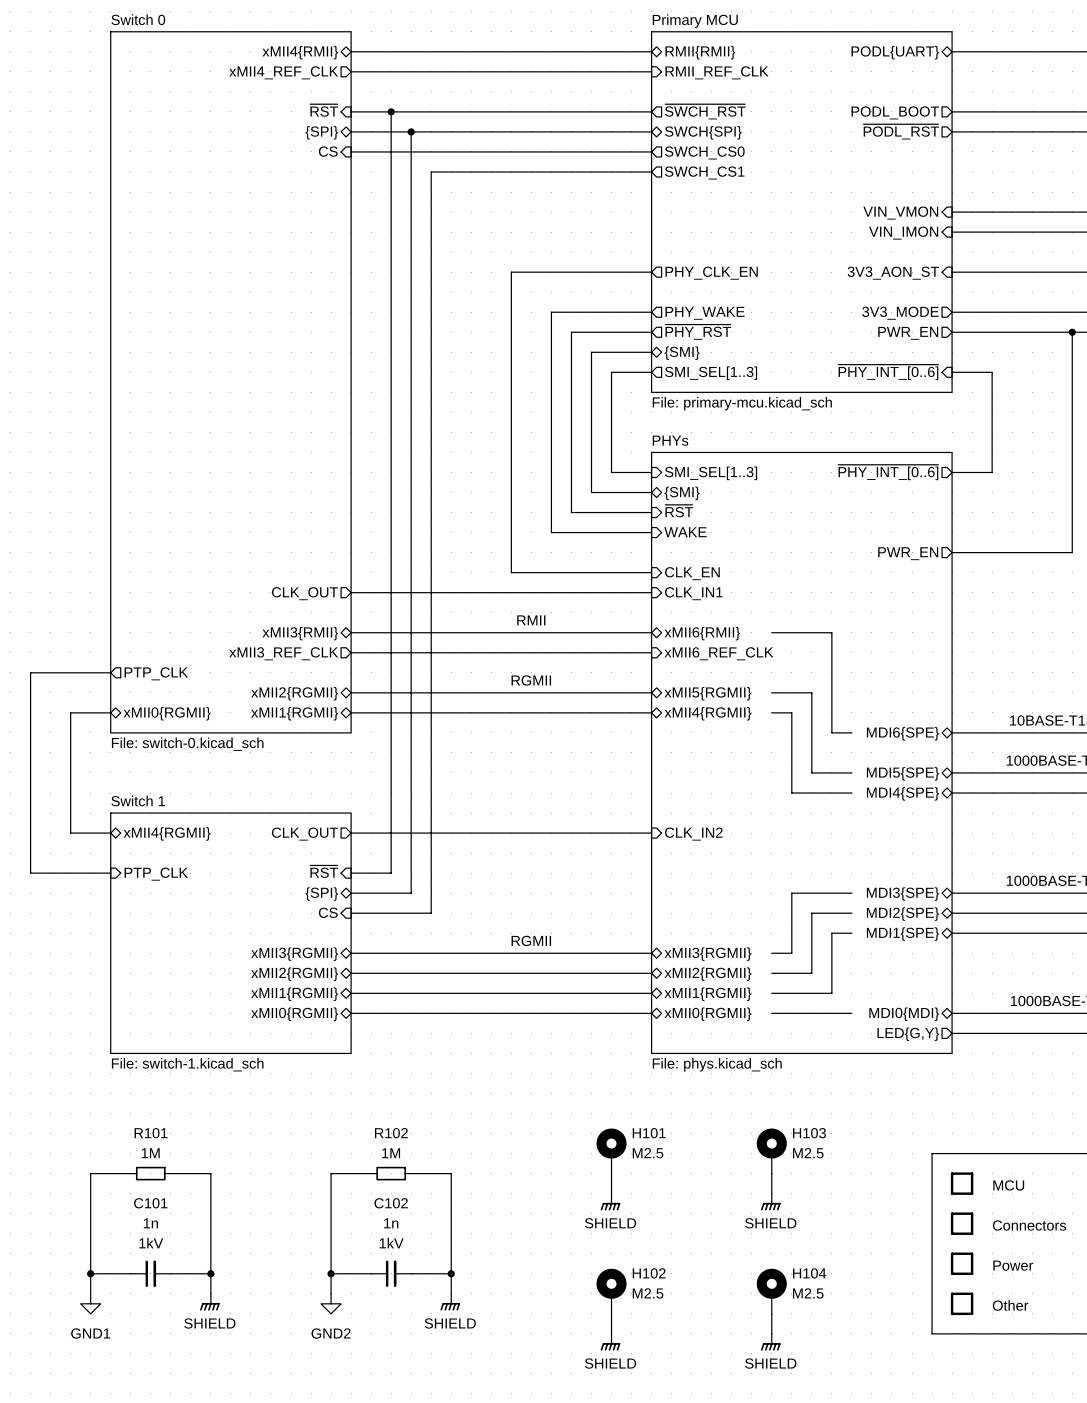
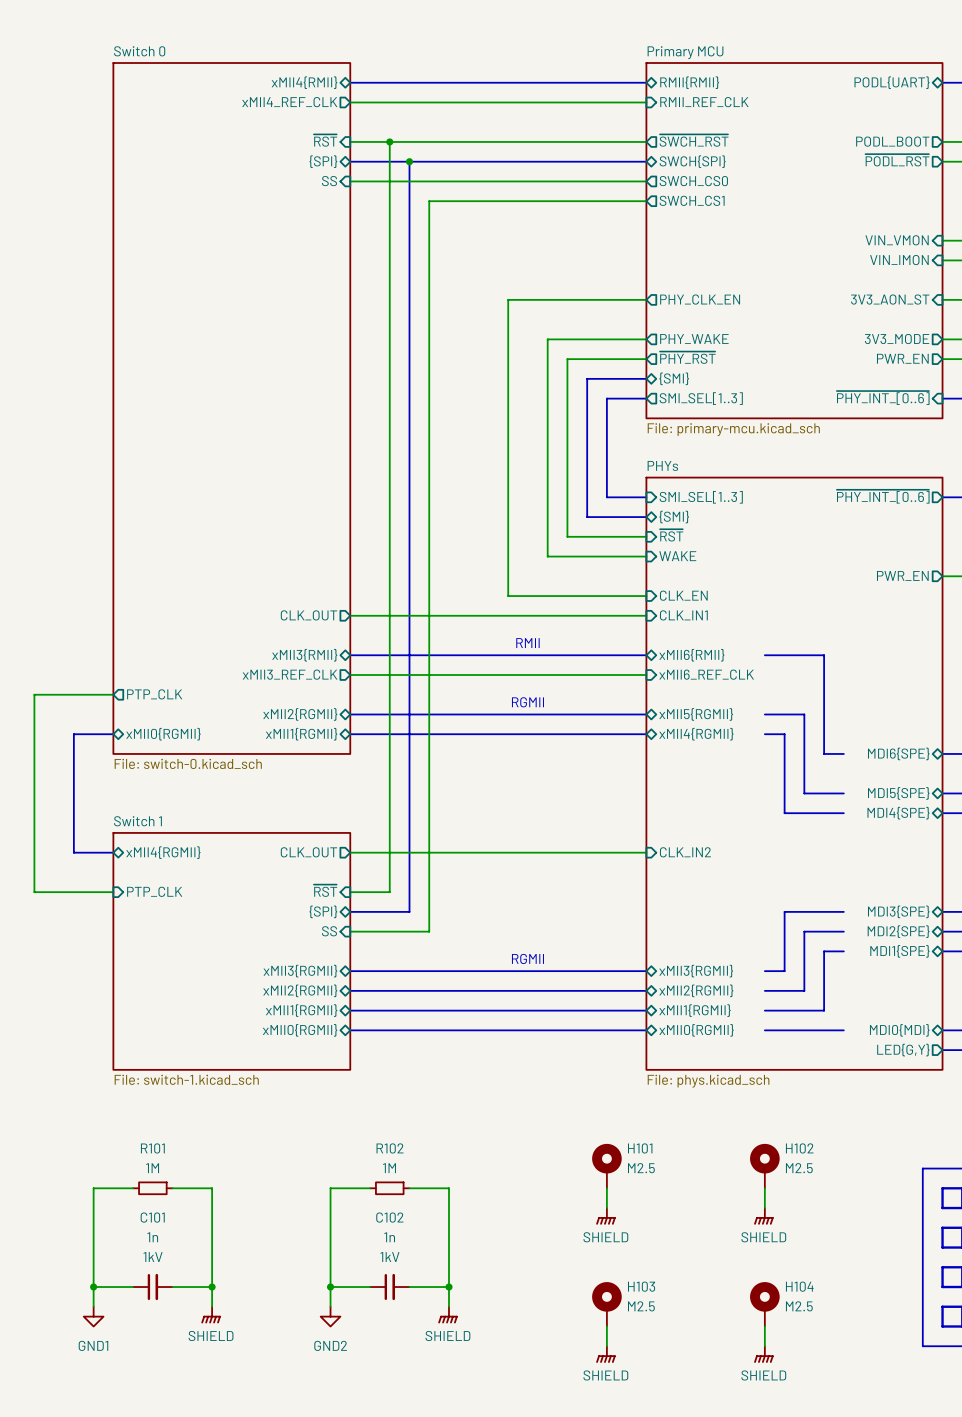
sheet pin: CS (328, 151) -> SS (329, 181)
sheet pin: CS (328, 912) -> SS (329, 931)
H103 name: H103 (809, 1133) -> H102 (799, 1148)
H102 name: H102 (649, 1273) -> H103 (641, 1286)

